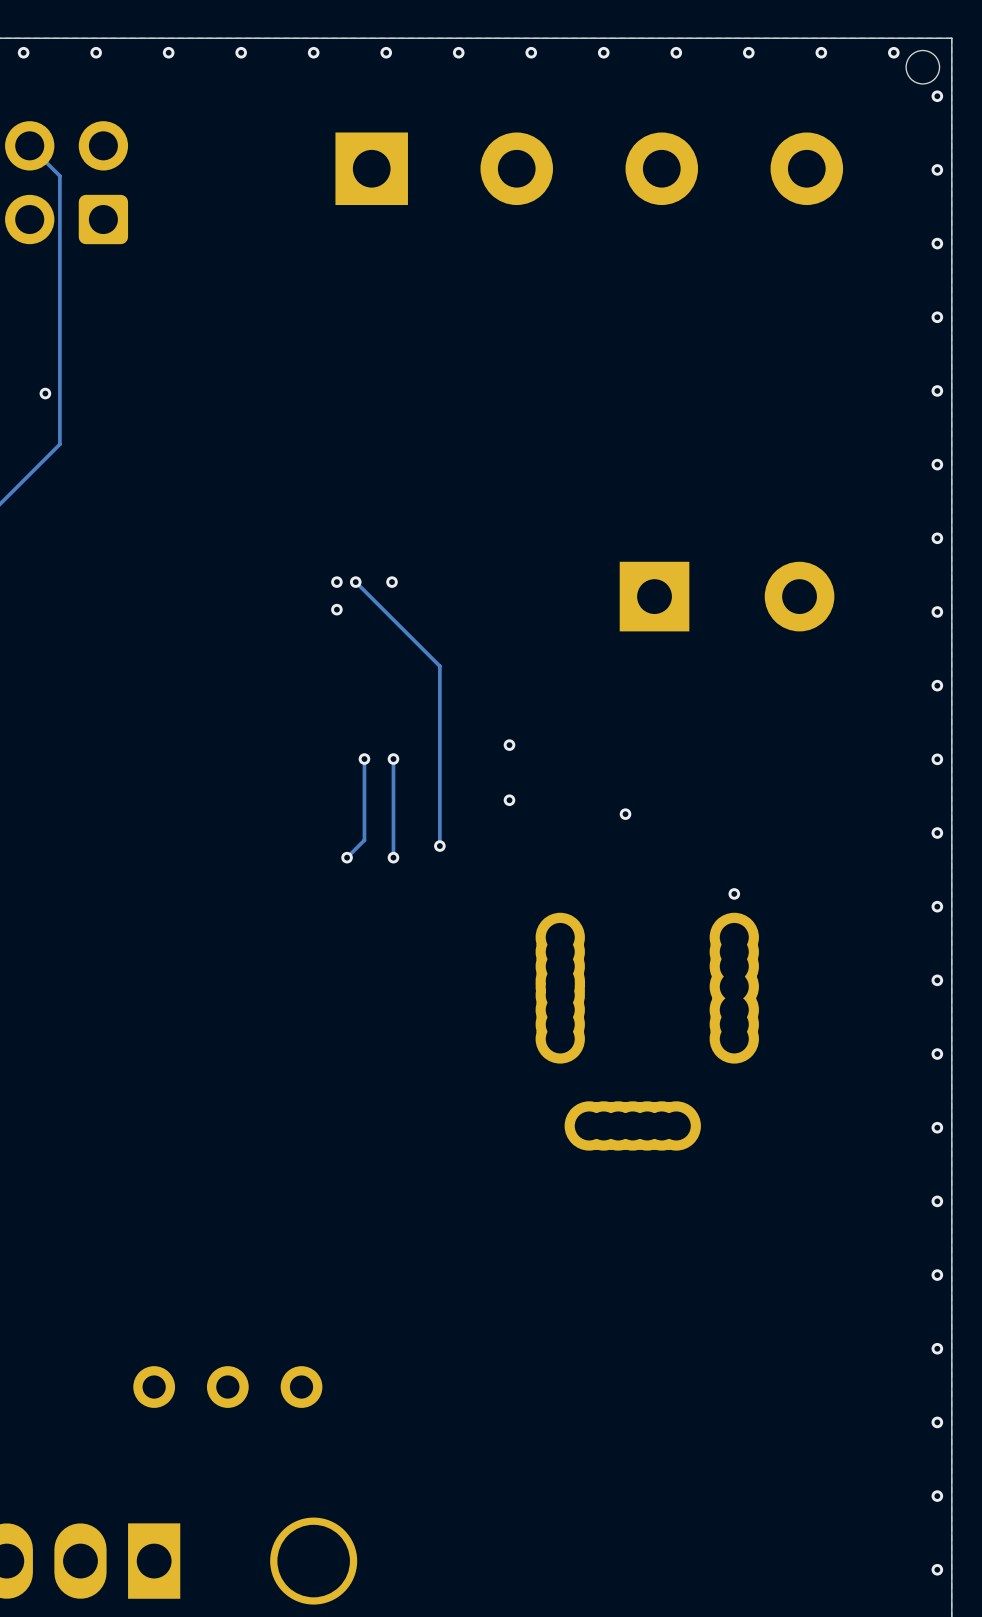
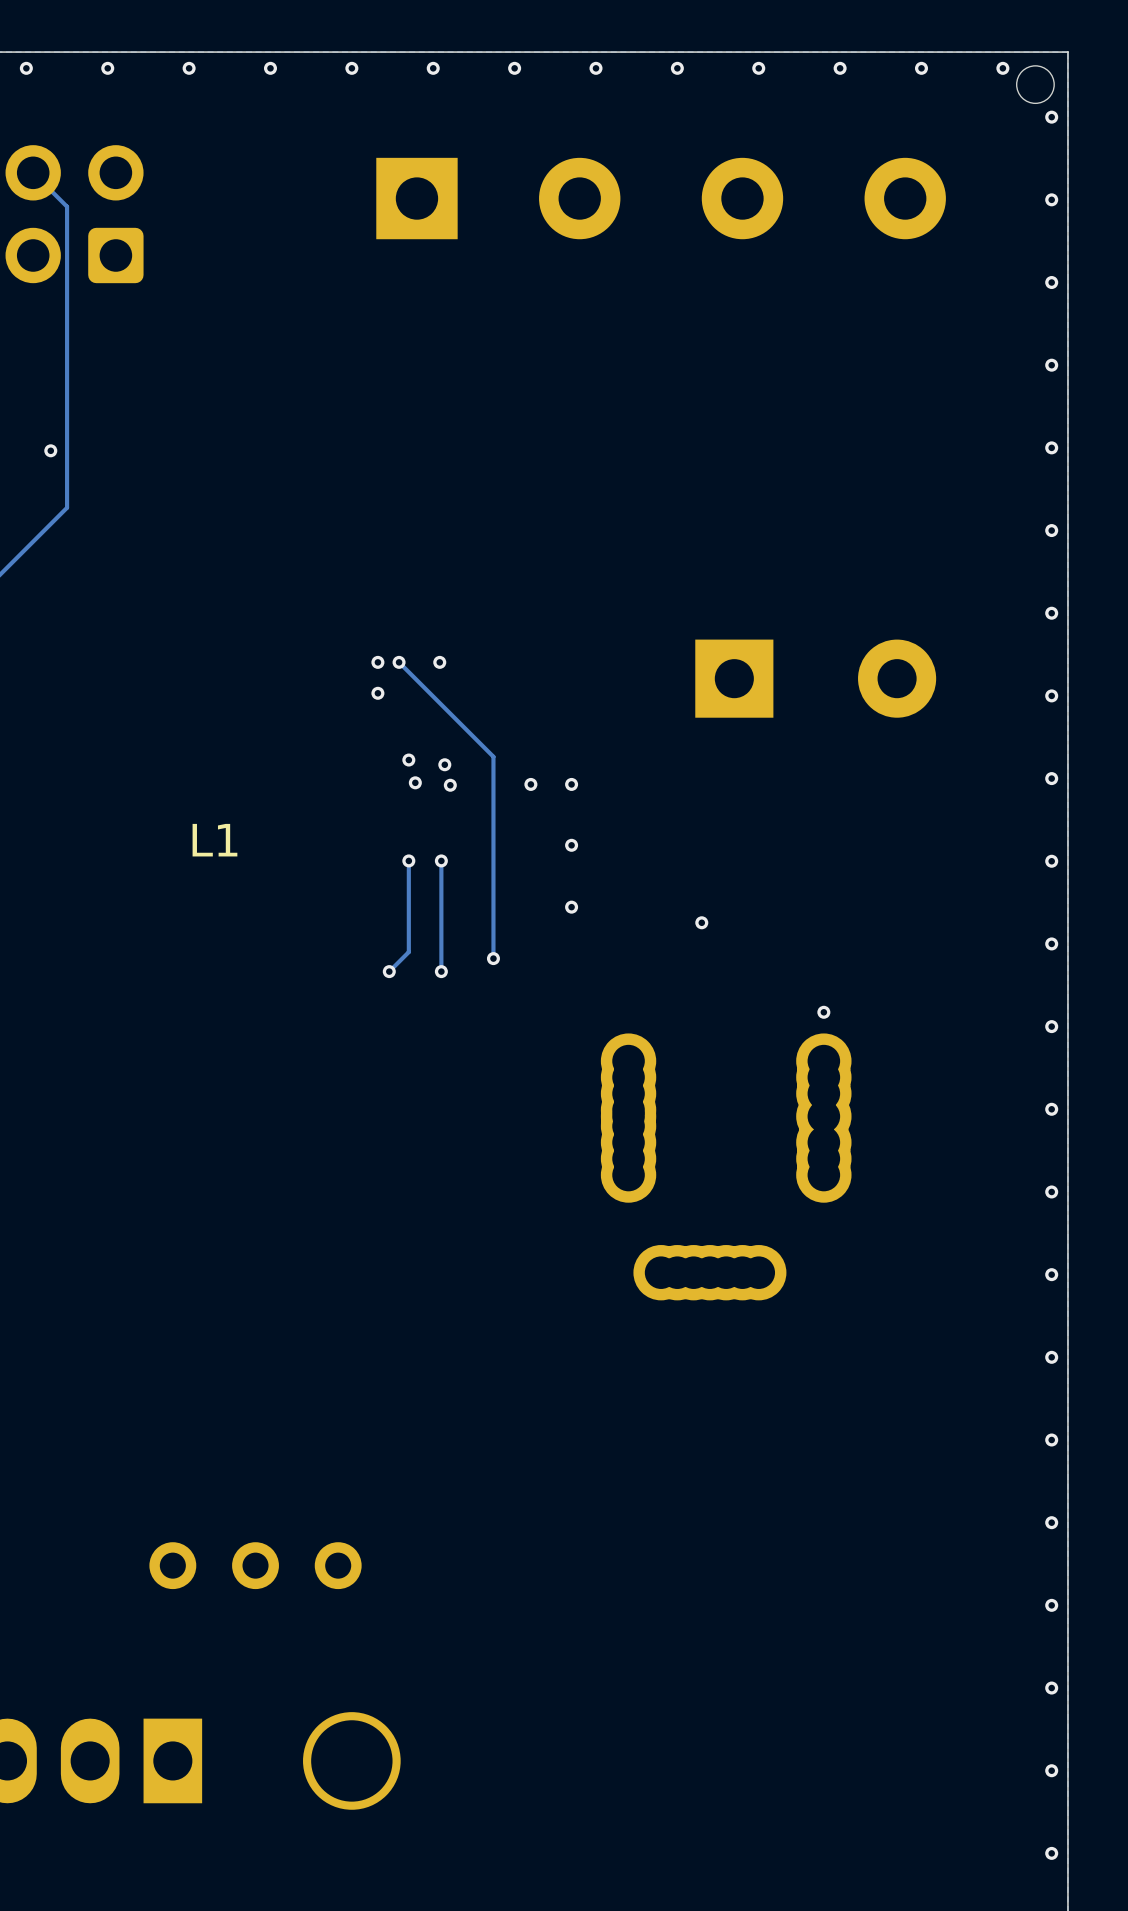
via: none -> (408, 760)
via: none -> (444, 764)
via: none -> (415, 782)
via: none -> (530, 784)
via: none -> (571, 784)
via: none -> (450, 785)
L1: none -> (214, 840)

